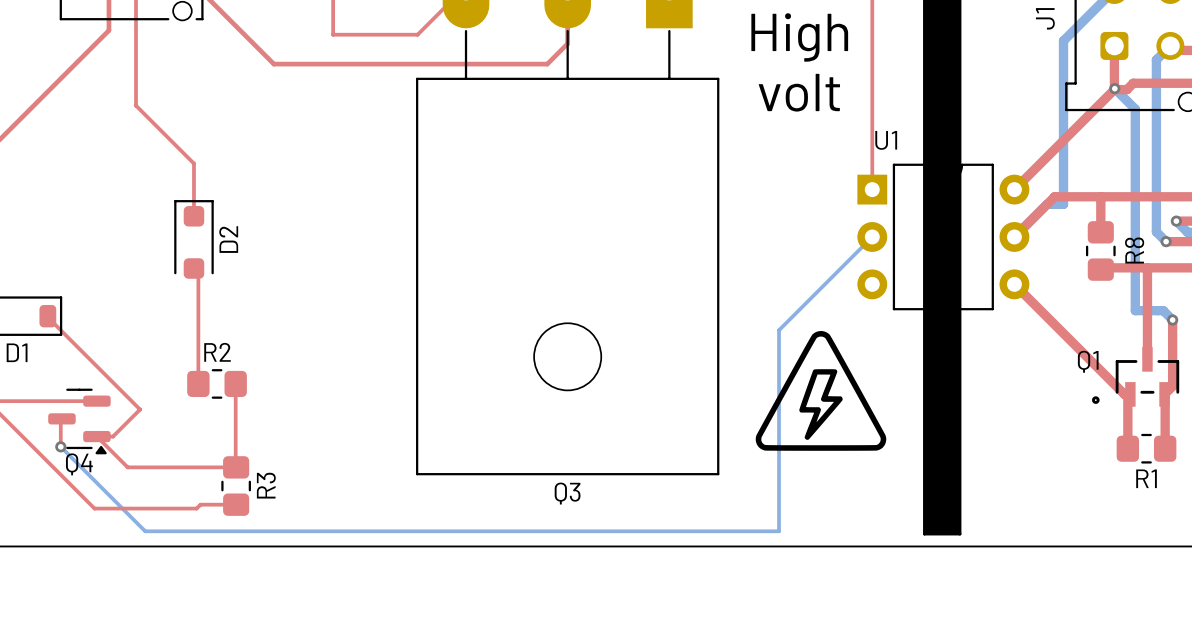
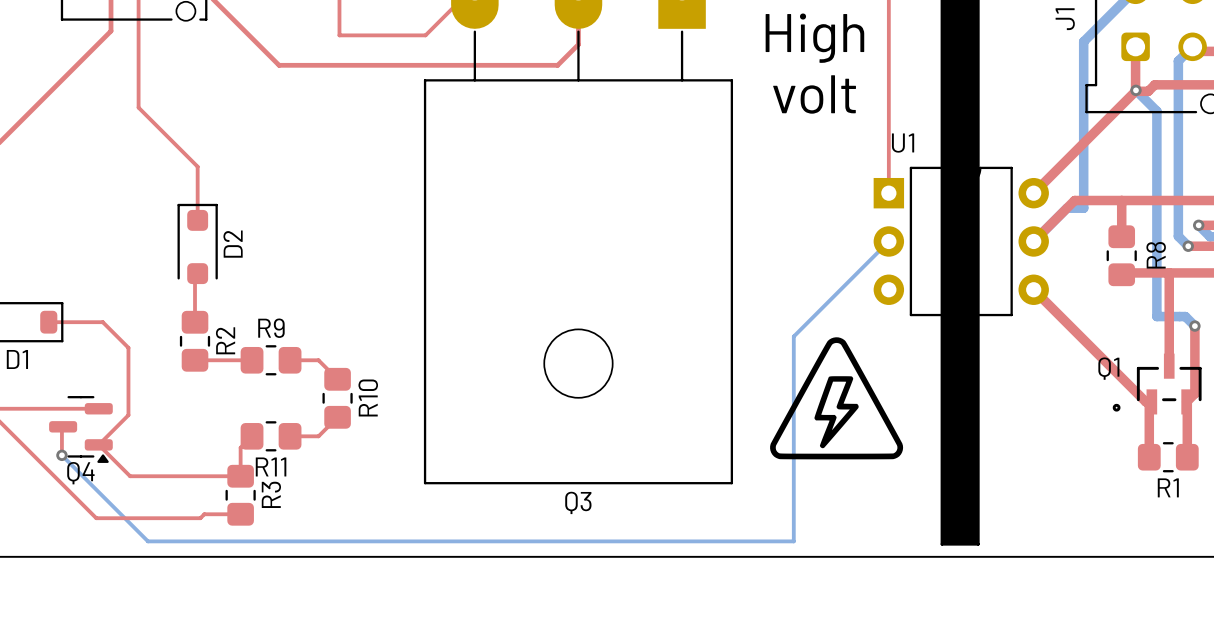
top track: none -> (197, 273) (195, 276) (195, 322)
top track: (198, 272) (198, 383) -> none
top track: (47, 317) (140, 409) (113, 436) (96, 436) -> (48, 322) (102, 322) (128, 347) (128, 415) (98, 444)
top track: none -> (195, 360) (252, 360)
R9: none -> (271, 360)
top track: none -> (290, 360) (318, 360) (337, 379)
R2 rotation: 0° (217, 383) -> 90° clockwise (195, 341)
R2 position: (217, 383) -> (195, 341)
top track: (235, 383) (235, 461) -> (252, 436) (240, 447) (240, 470)
R10: none -> (337, 398)
top track: none -> (337, 417) (318, 436) (290, 436)
R11: none -> (271, 436)

